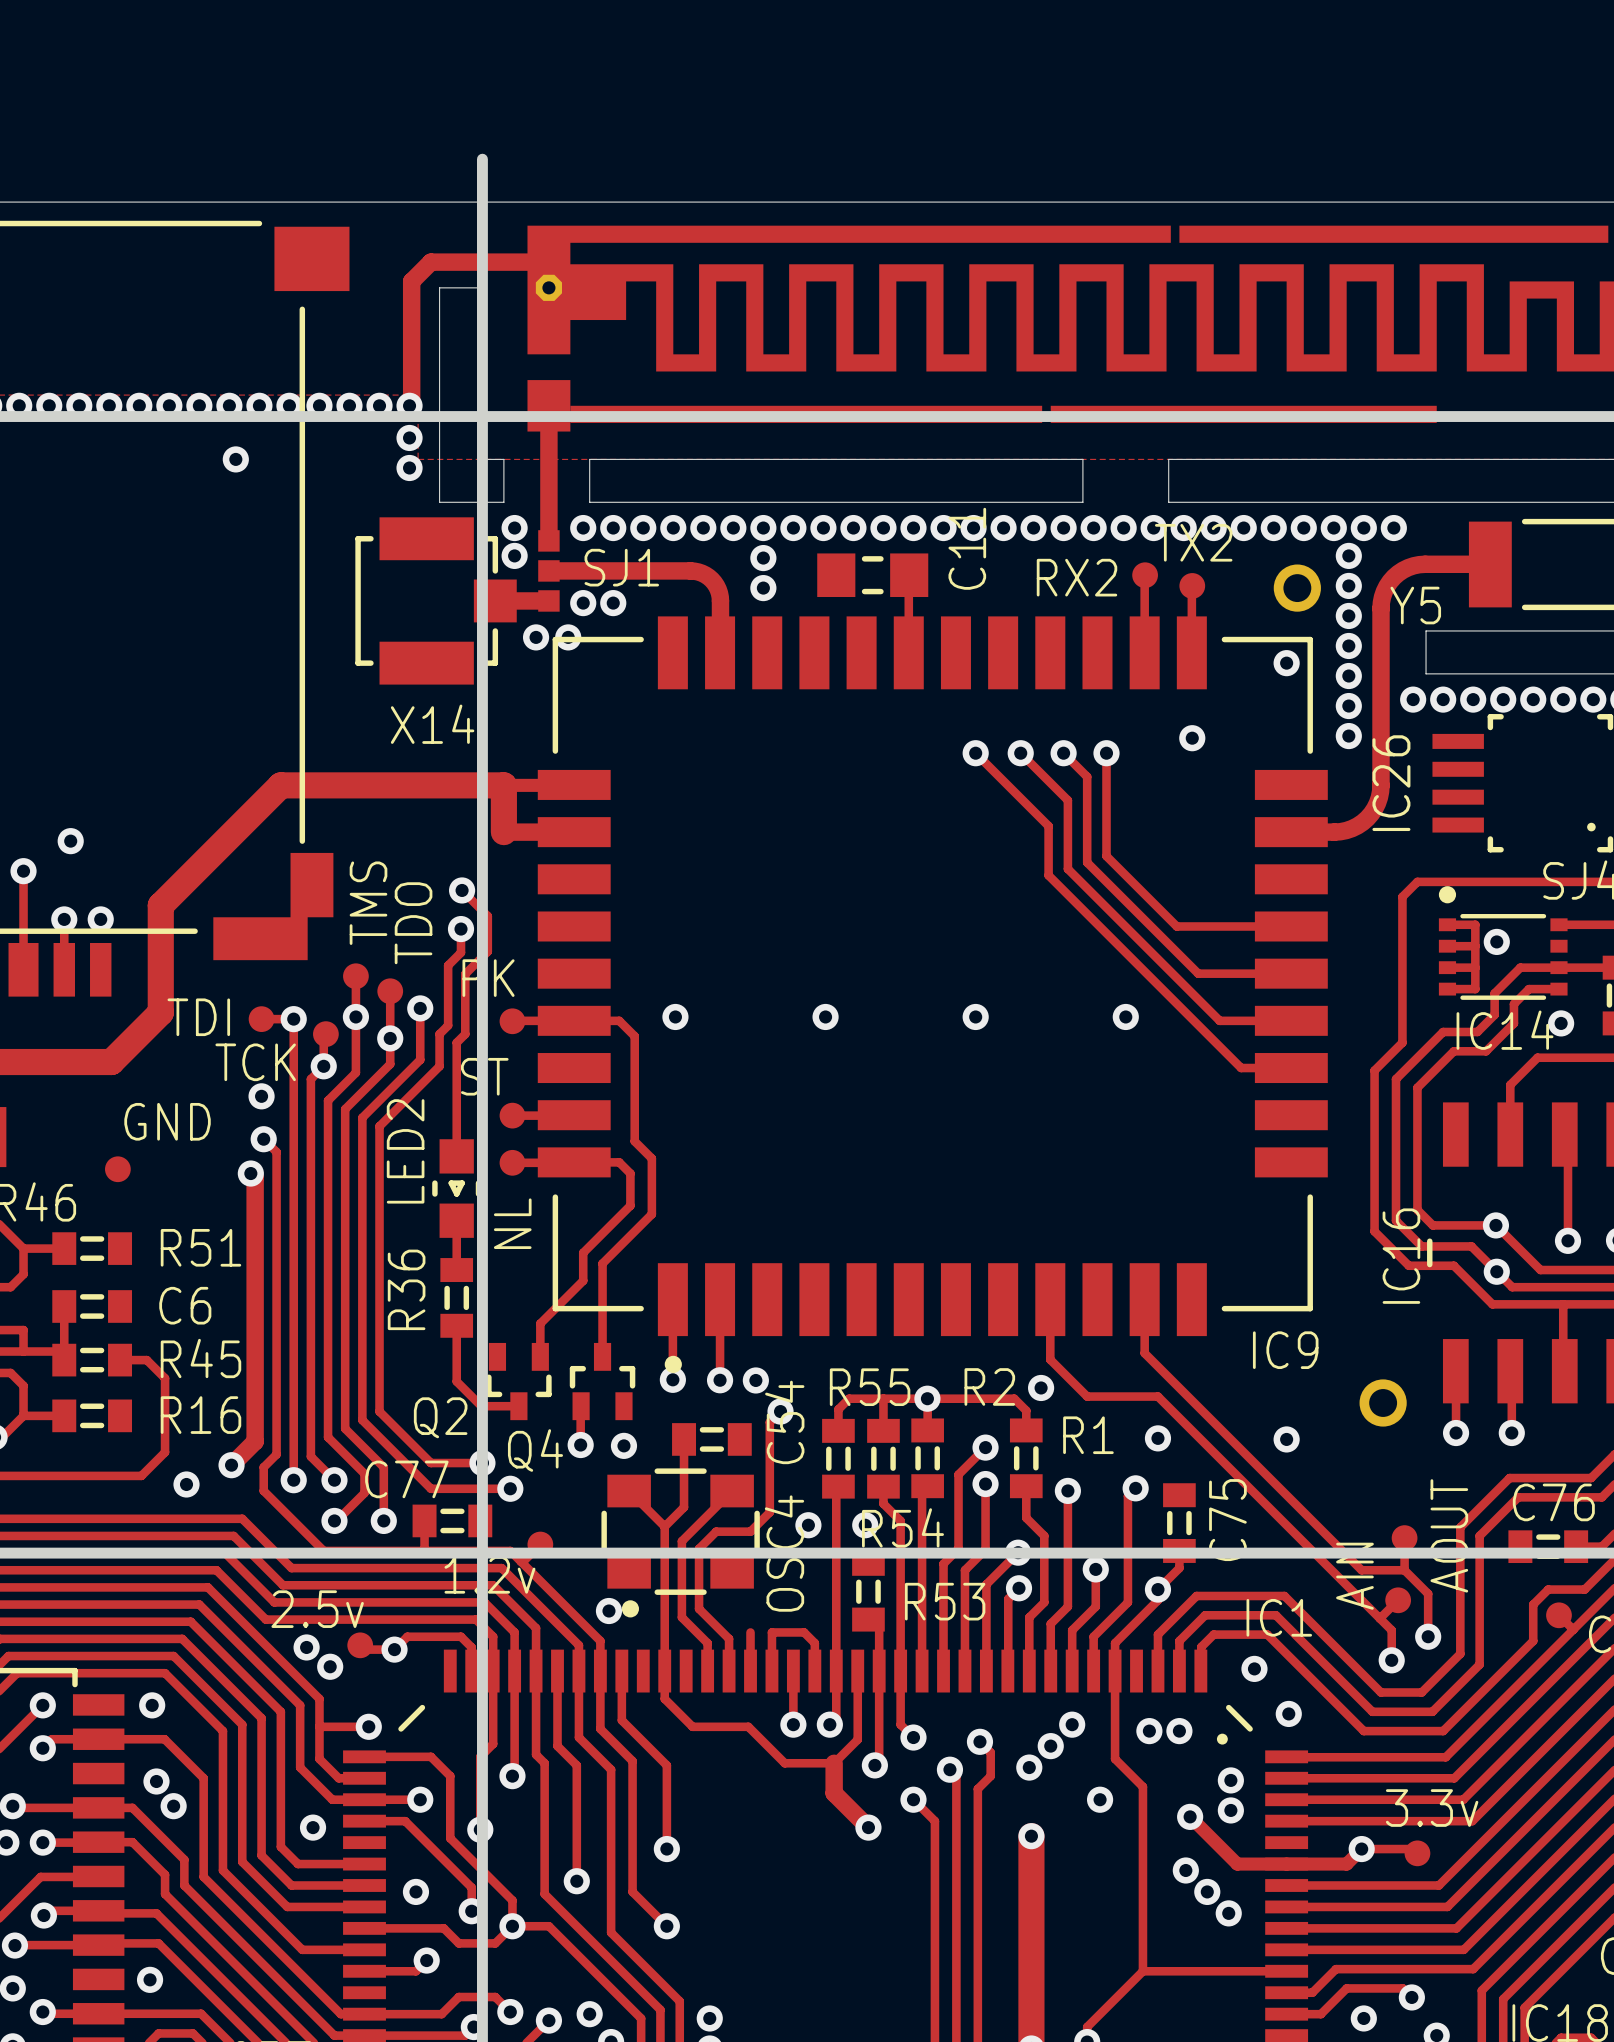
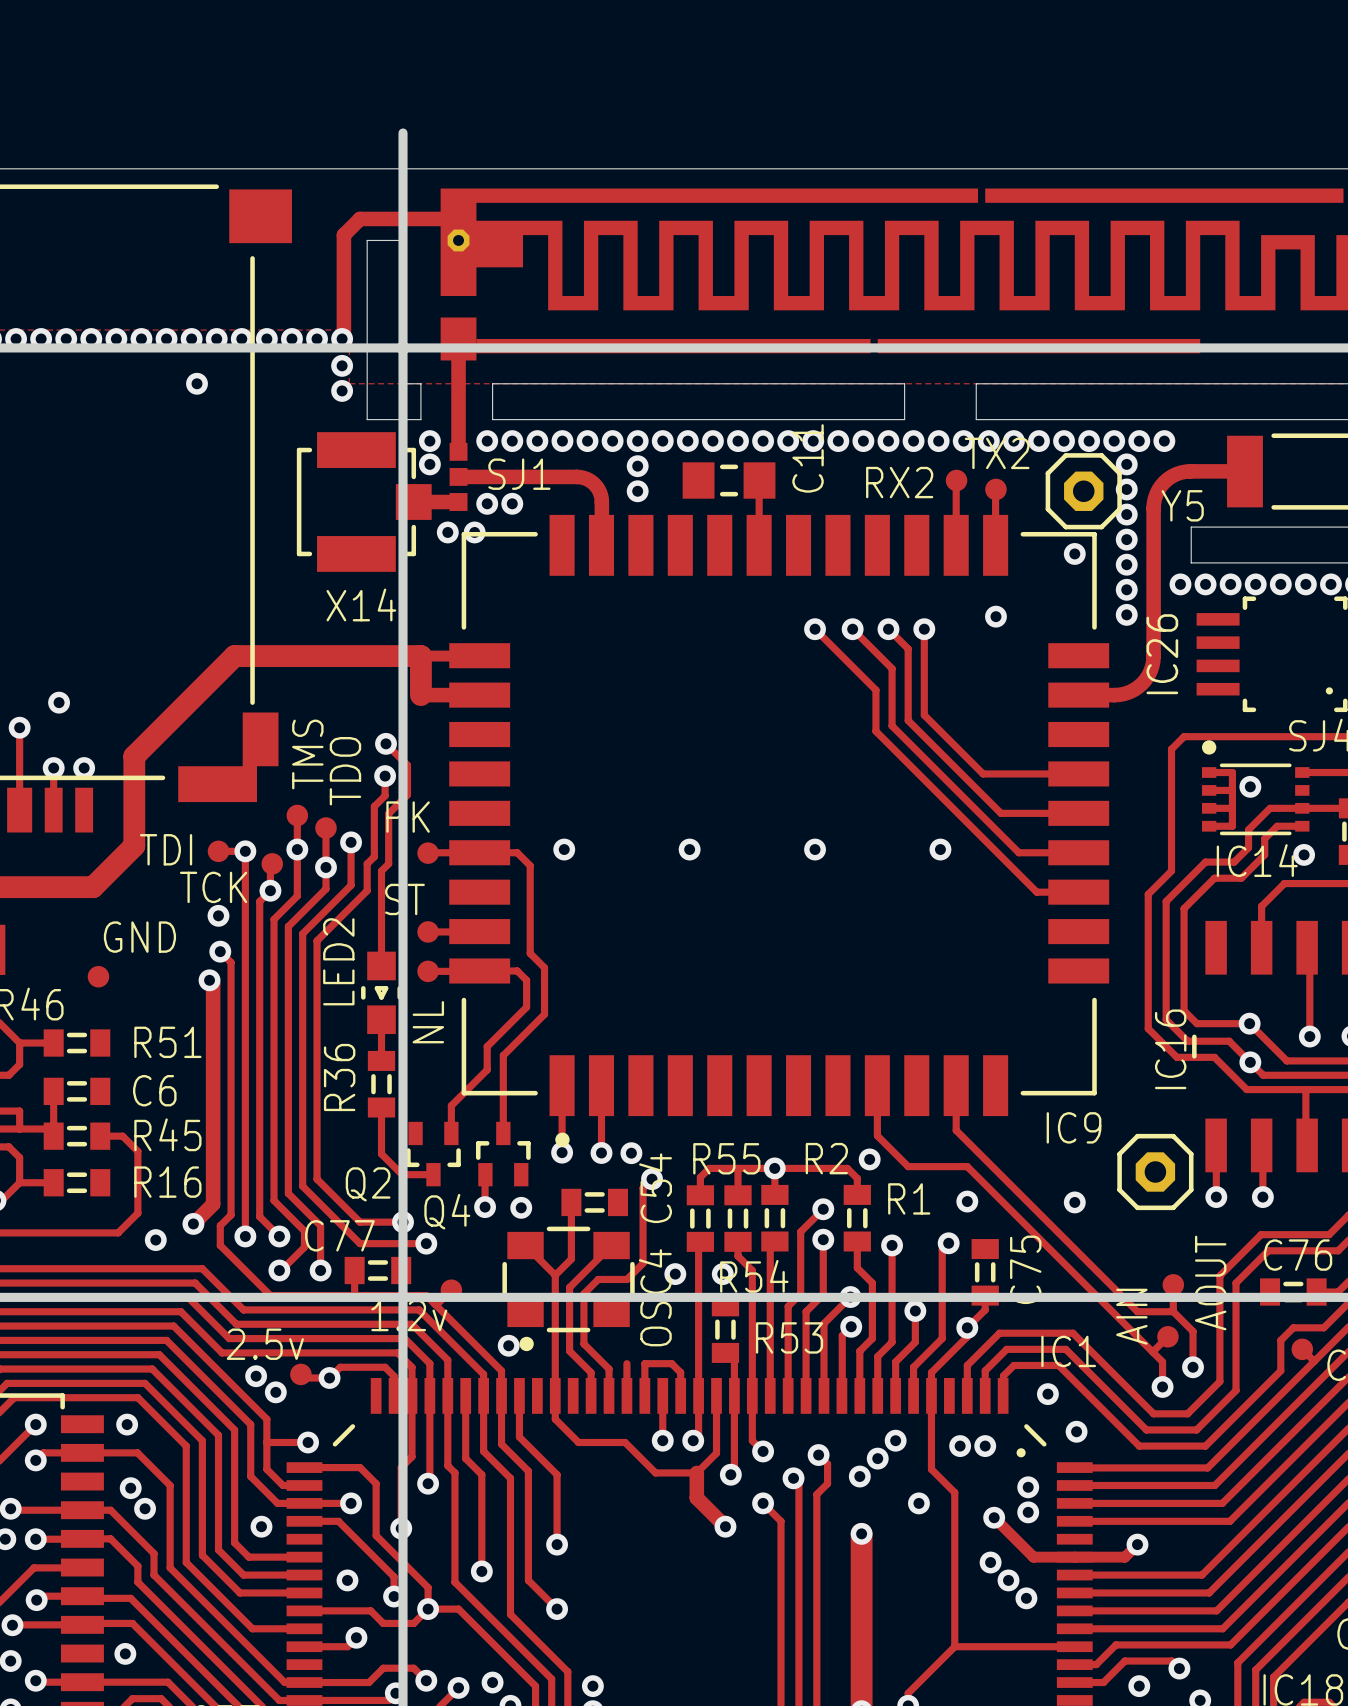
part footprint: [1273, 564, 1321, 612] -> [1045, 453, 1122, 530]
part footprint: [1359, 1379, 1407, 1427] -> [1117, 1133, 1194, 1211]
track: (1361, 1849) (1413, 1849) (1417, 1853) -> none
part: 3.3v (1417, 1853) -> none

